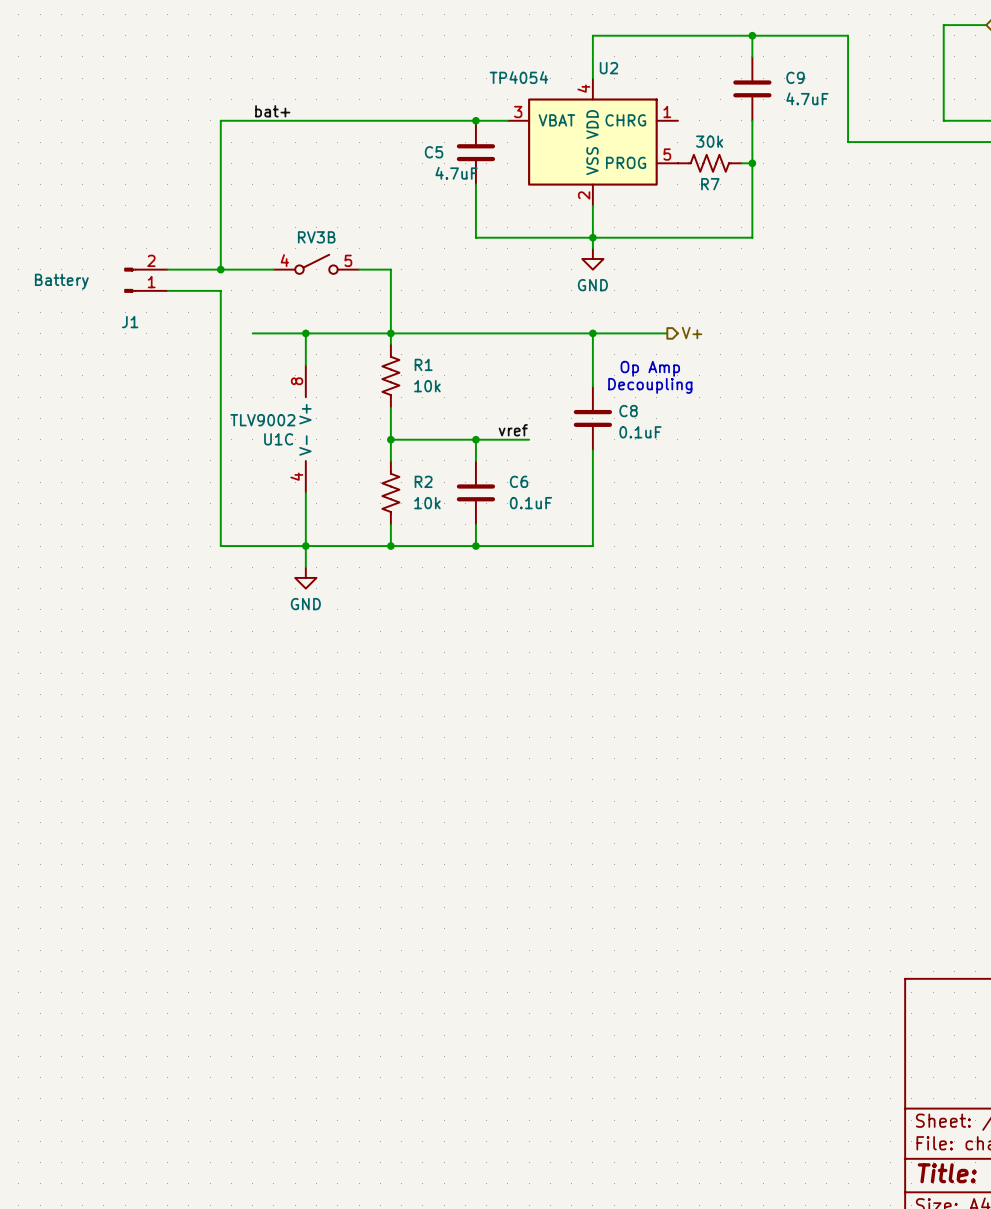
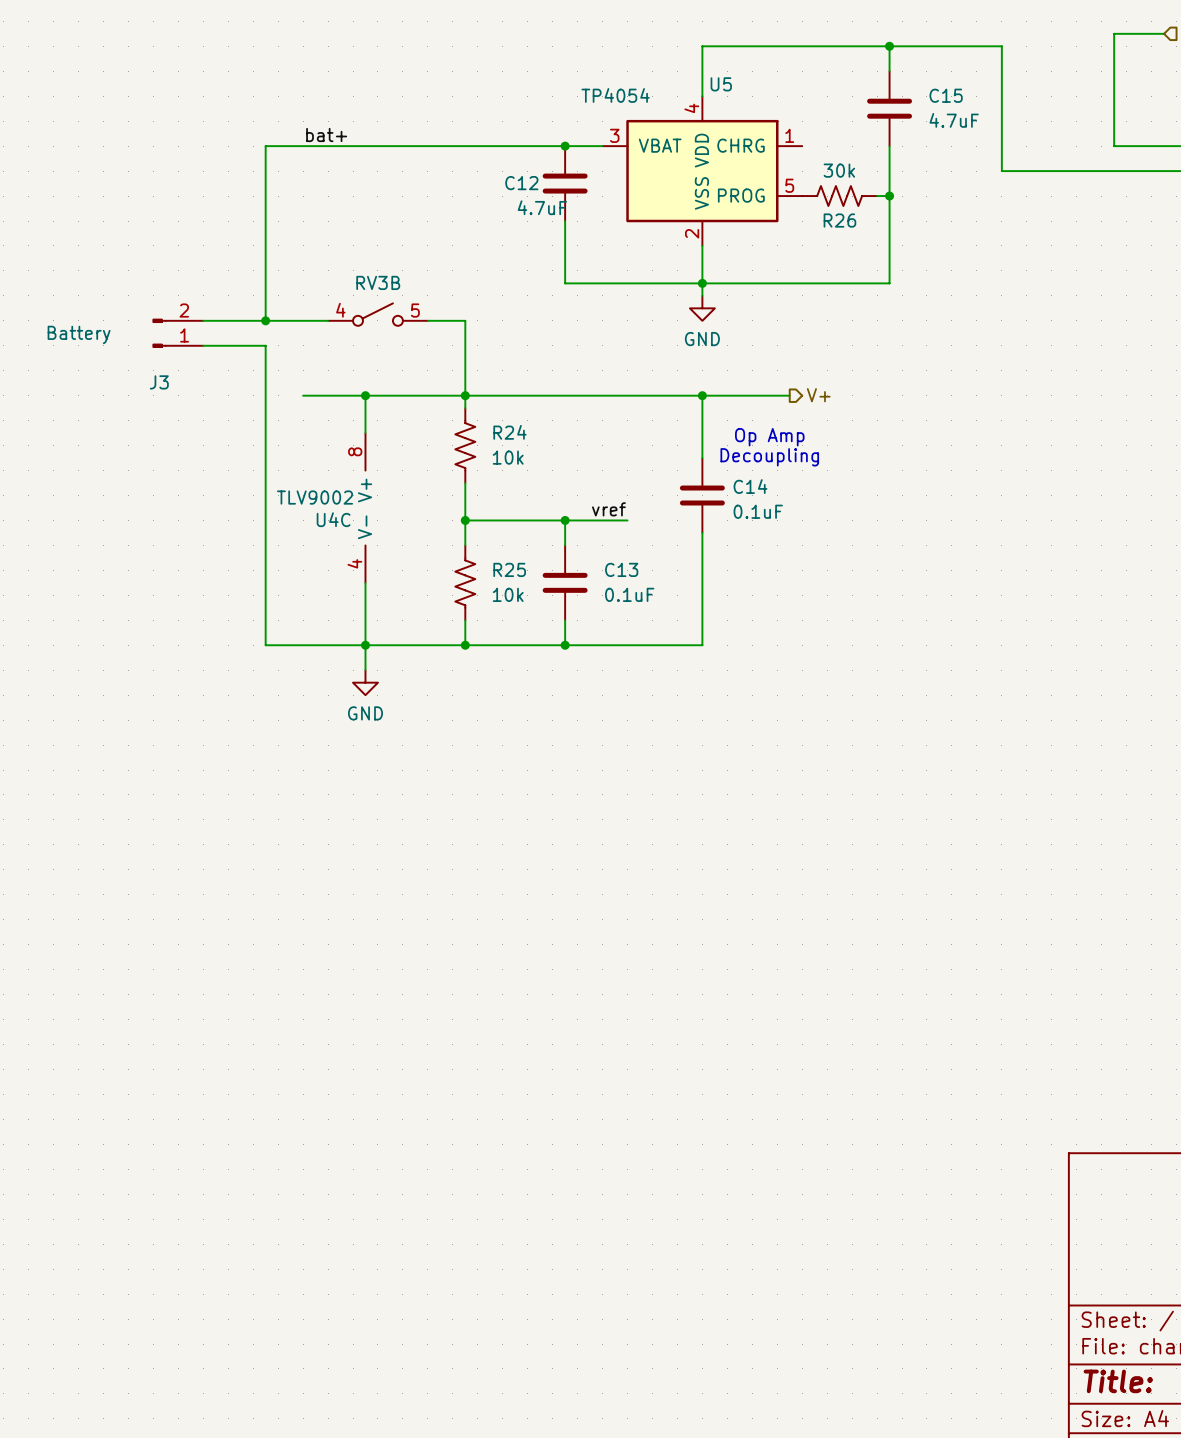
U2 name: U2 (608, 68) -> U5 (721, 84)
C9 name: C9 (795, 77) -> C15 (946, 95)
C5 name: C5 (434, 152) -> C12 (521, 183)
R7 name: R7 (710, 184) -> R26 (839, 220)
J1 name: J1 (130, 322) -> J3 (159, 382)
R1 name: R1 (423, 364) -> R24 (509, 432)
C8 name: C8 (628, 411) -> C14 (750, 486)
U1C name: U1C (278, 439) -> U4C (333, 519)
R2 name: R2 (423, 481) -> R25 (509, 569)
C6 name: C6 (519, 481) -> C13 (621, 569)

